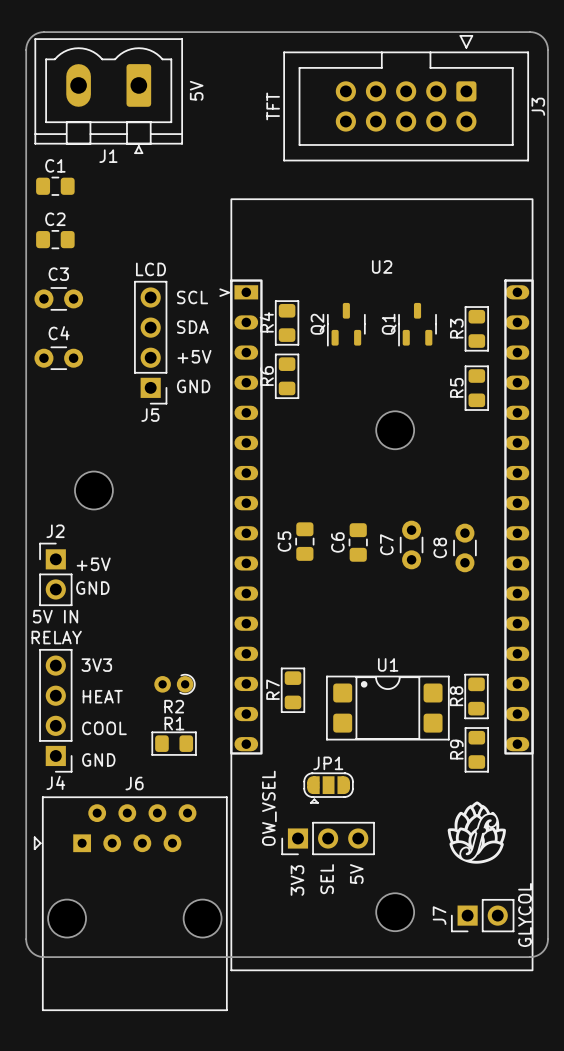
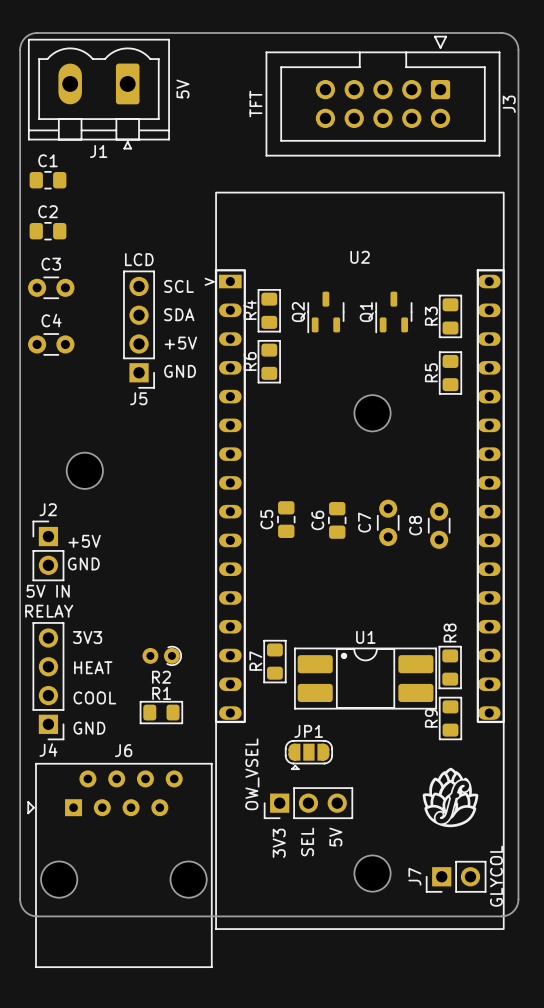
U1 footprint: [326, 675, 450, 741] -> [294, 647, 437, 710]
R8 name position: R8 (456, 696) -> R8 (450, 632)

